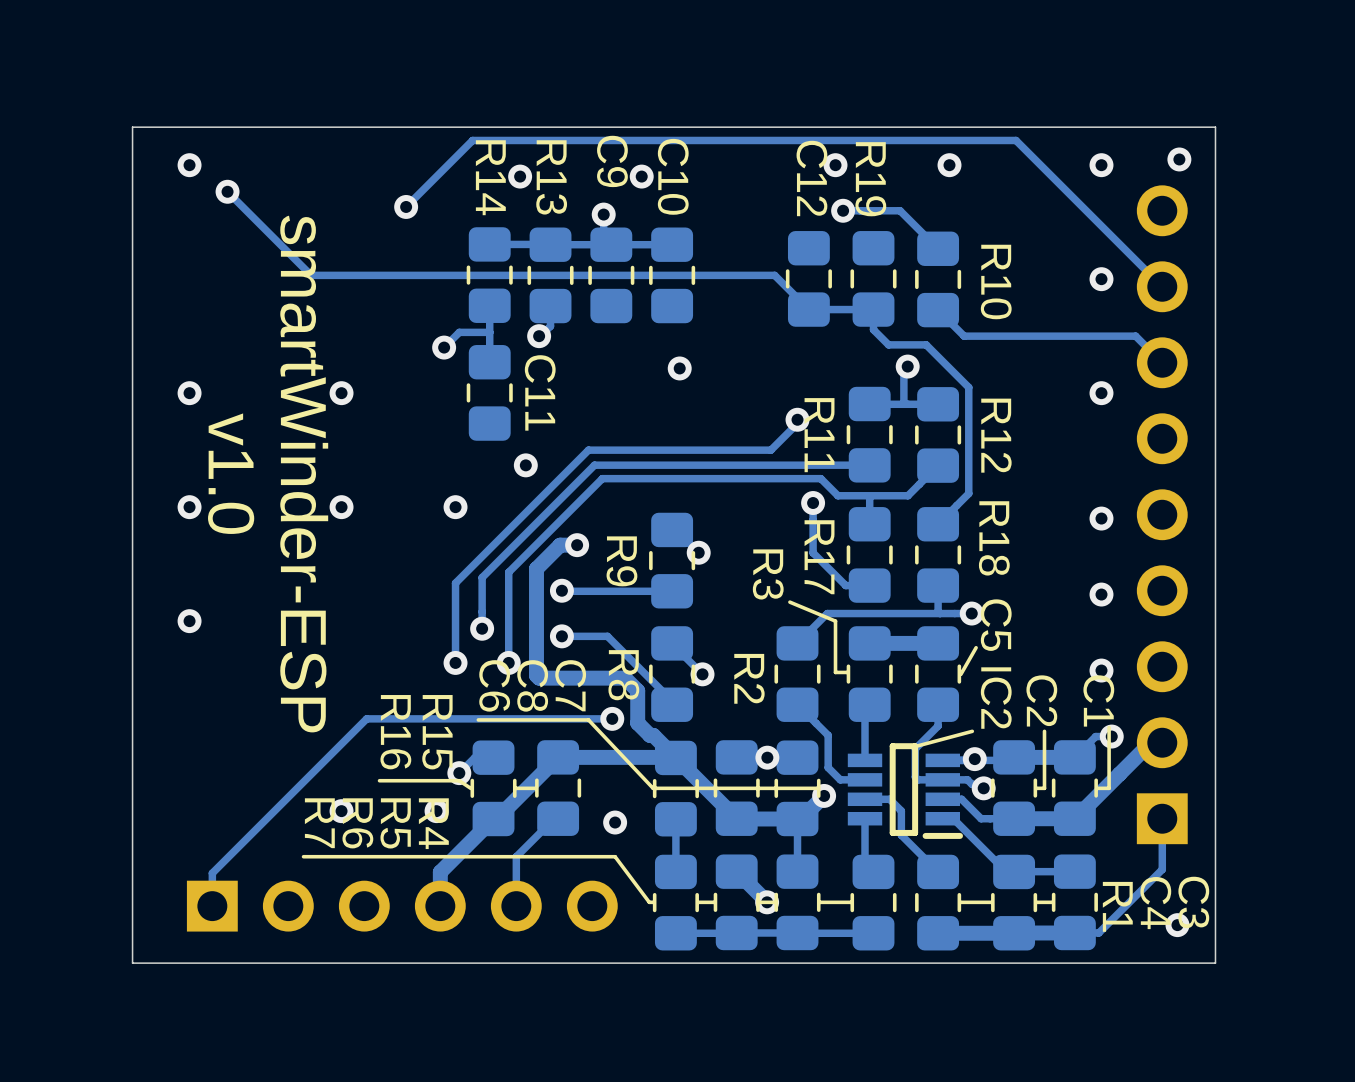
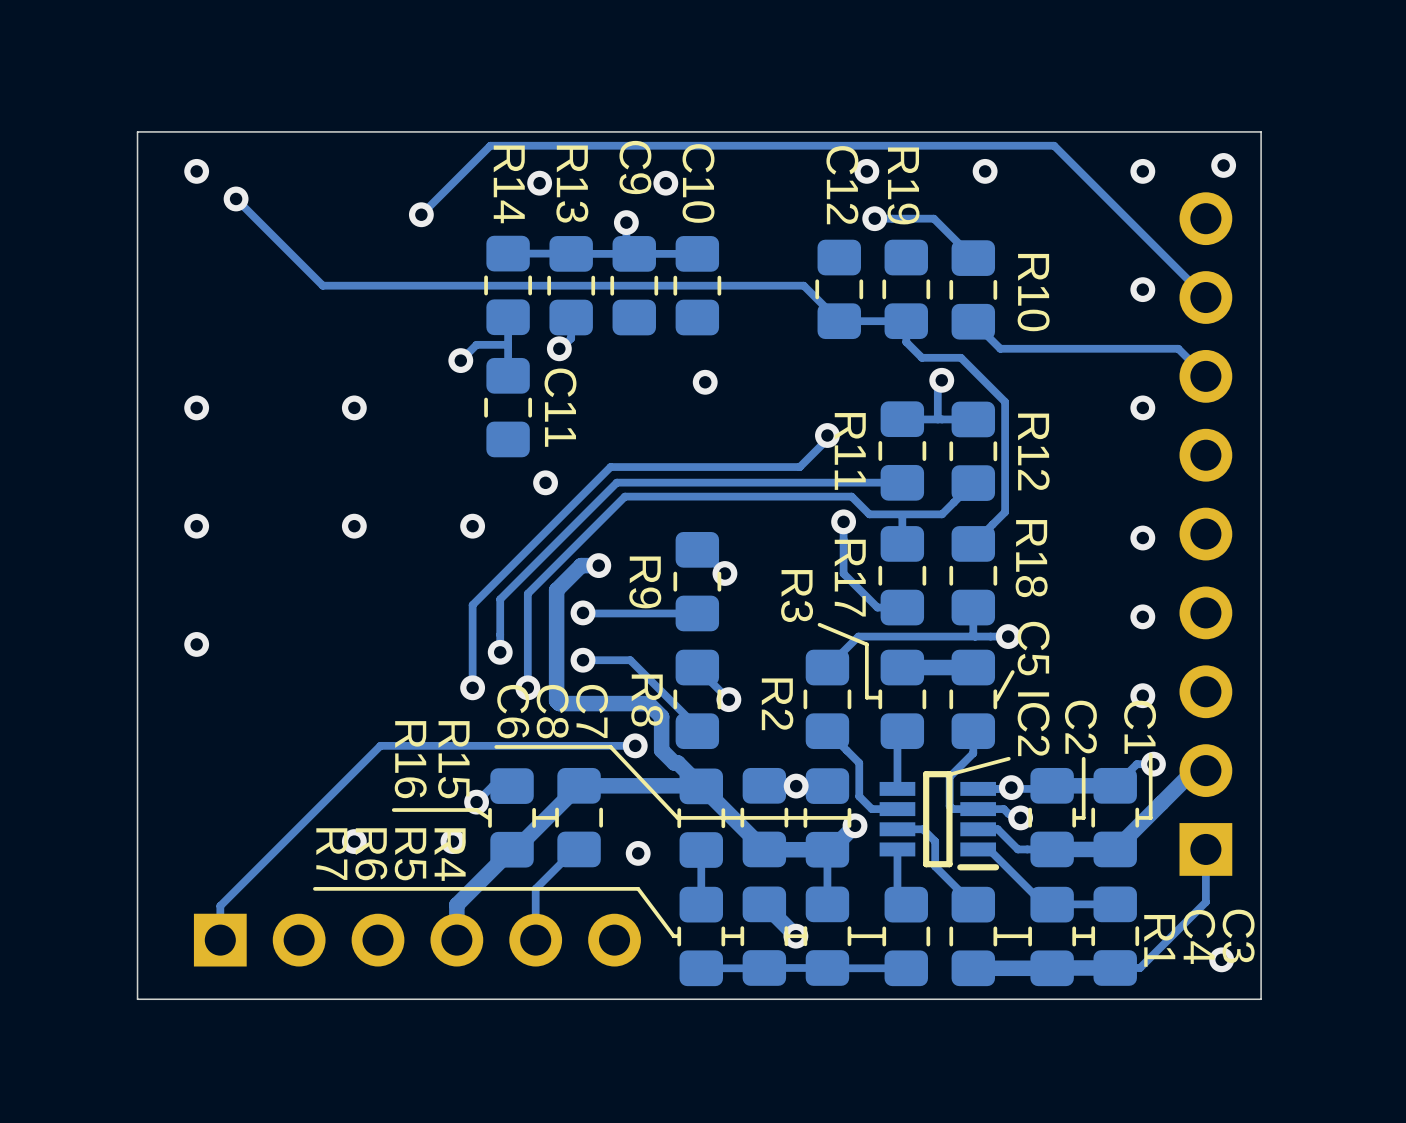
text: v1.0 (231, 473) -> none
text: smartWinder-ESP (304, 474) -> none

